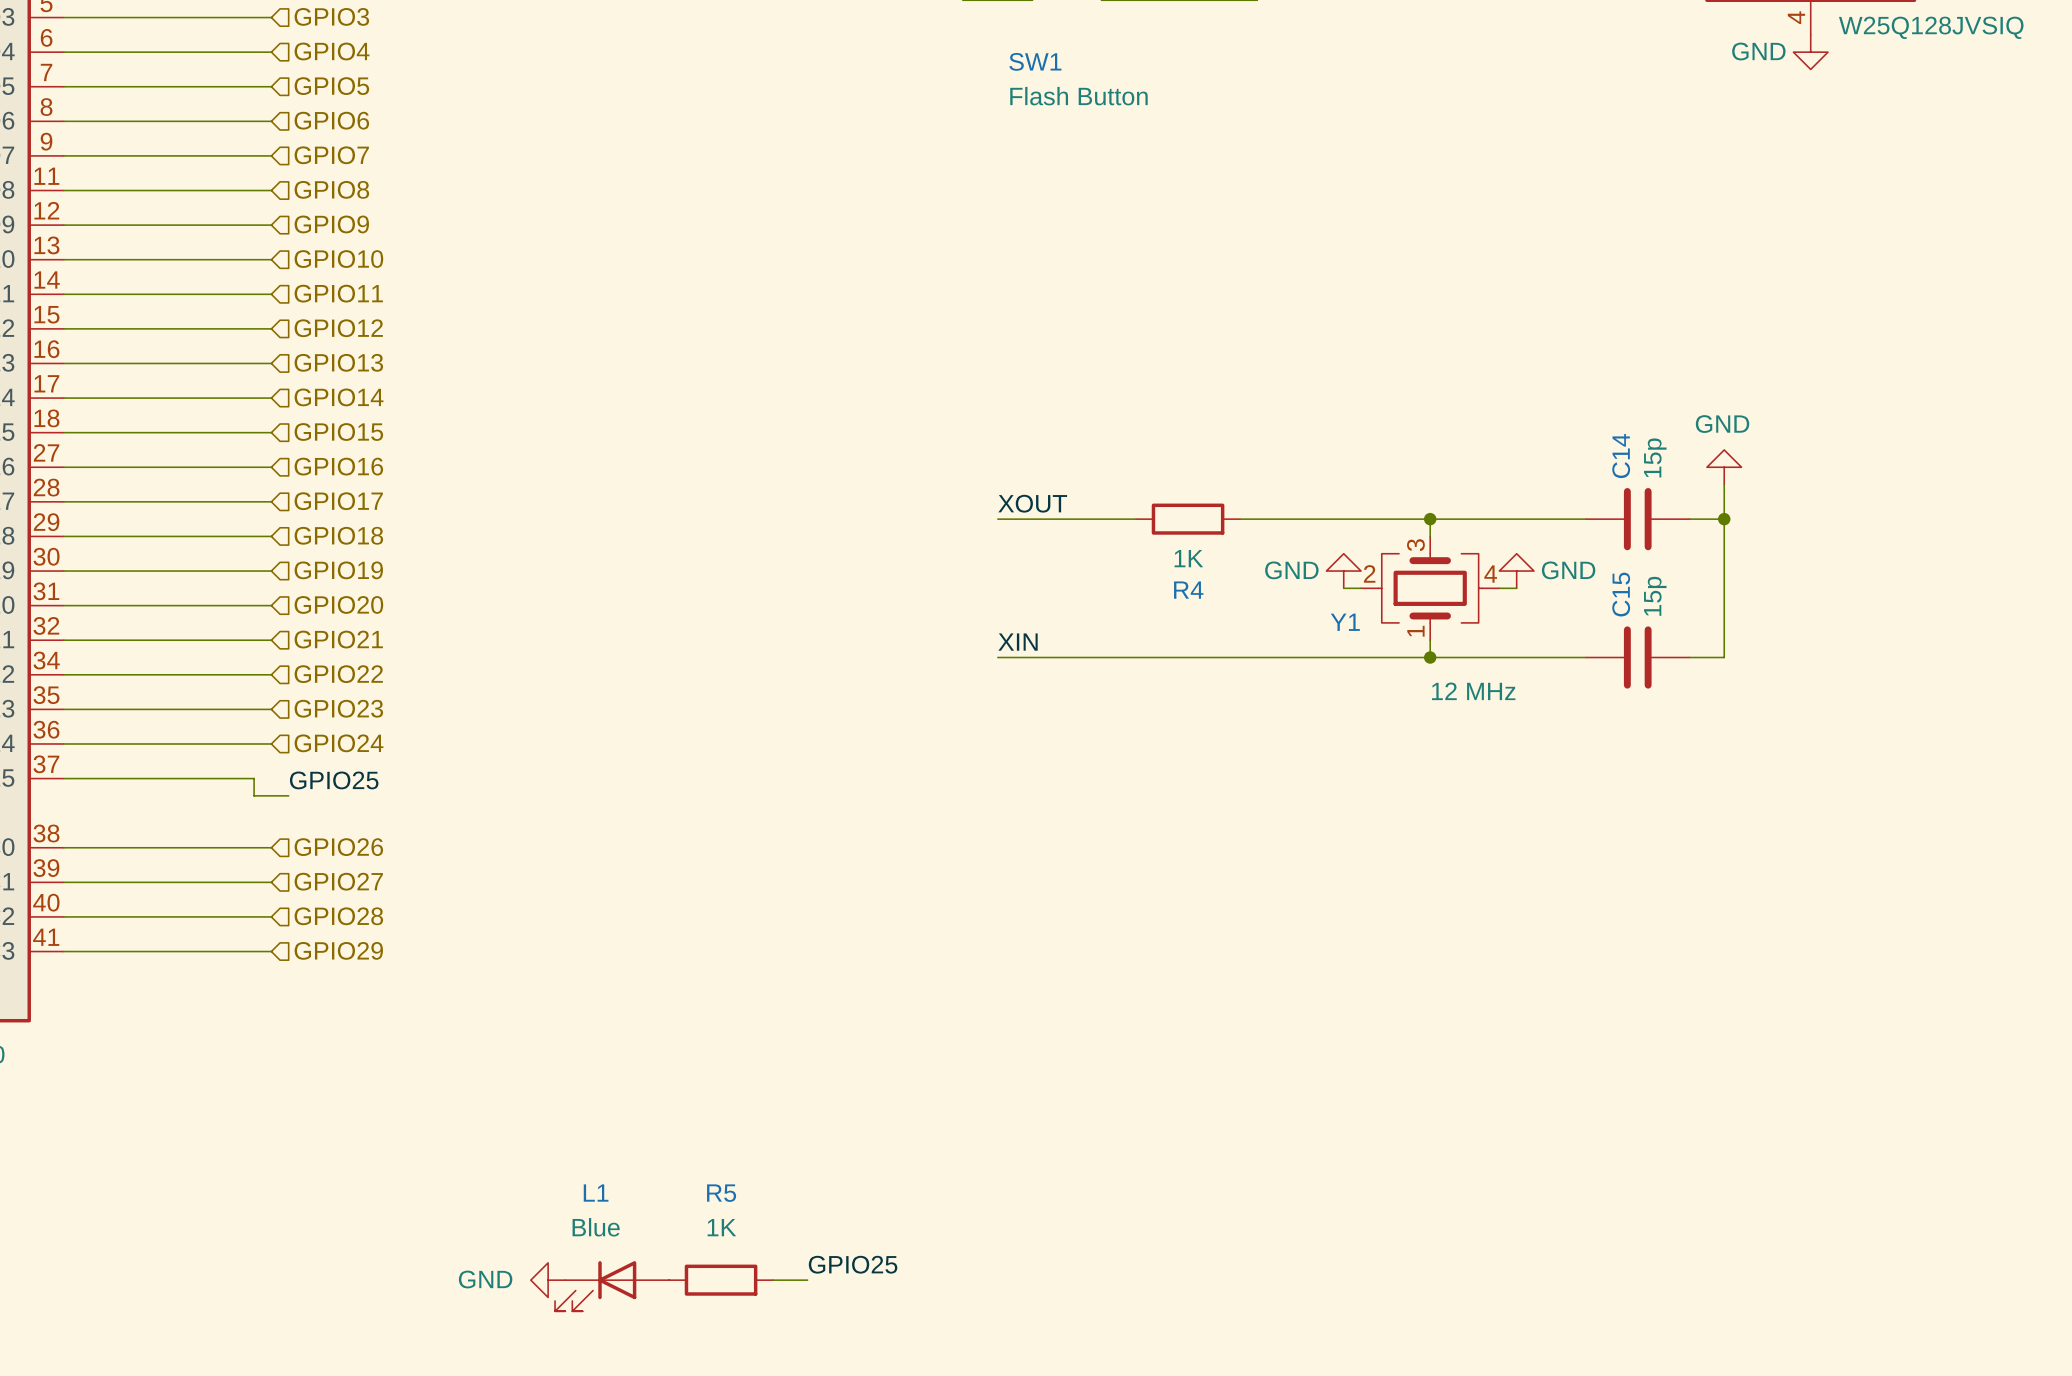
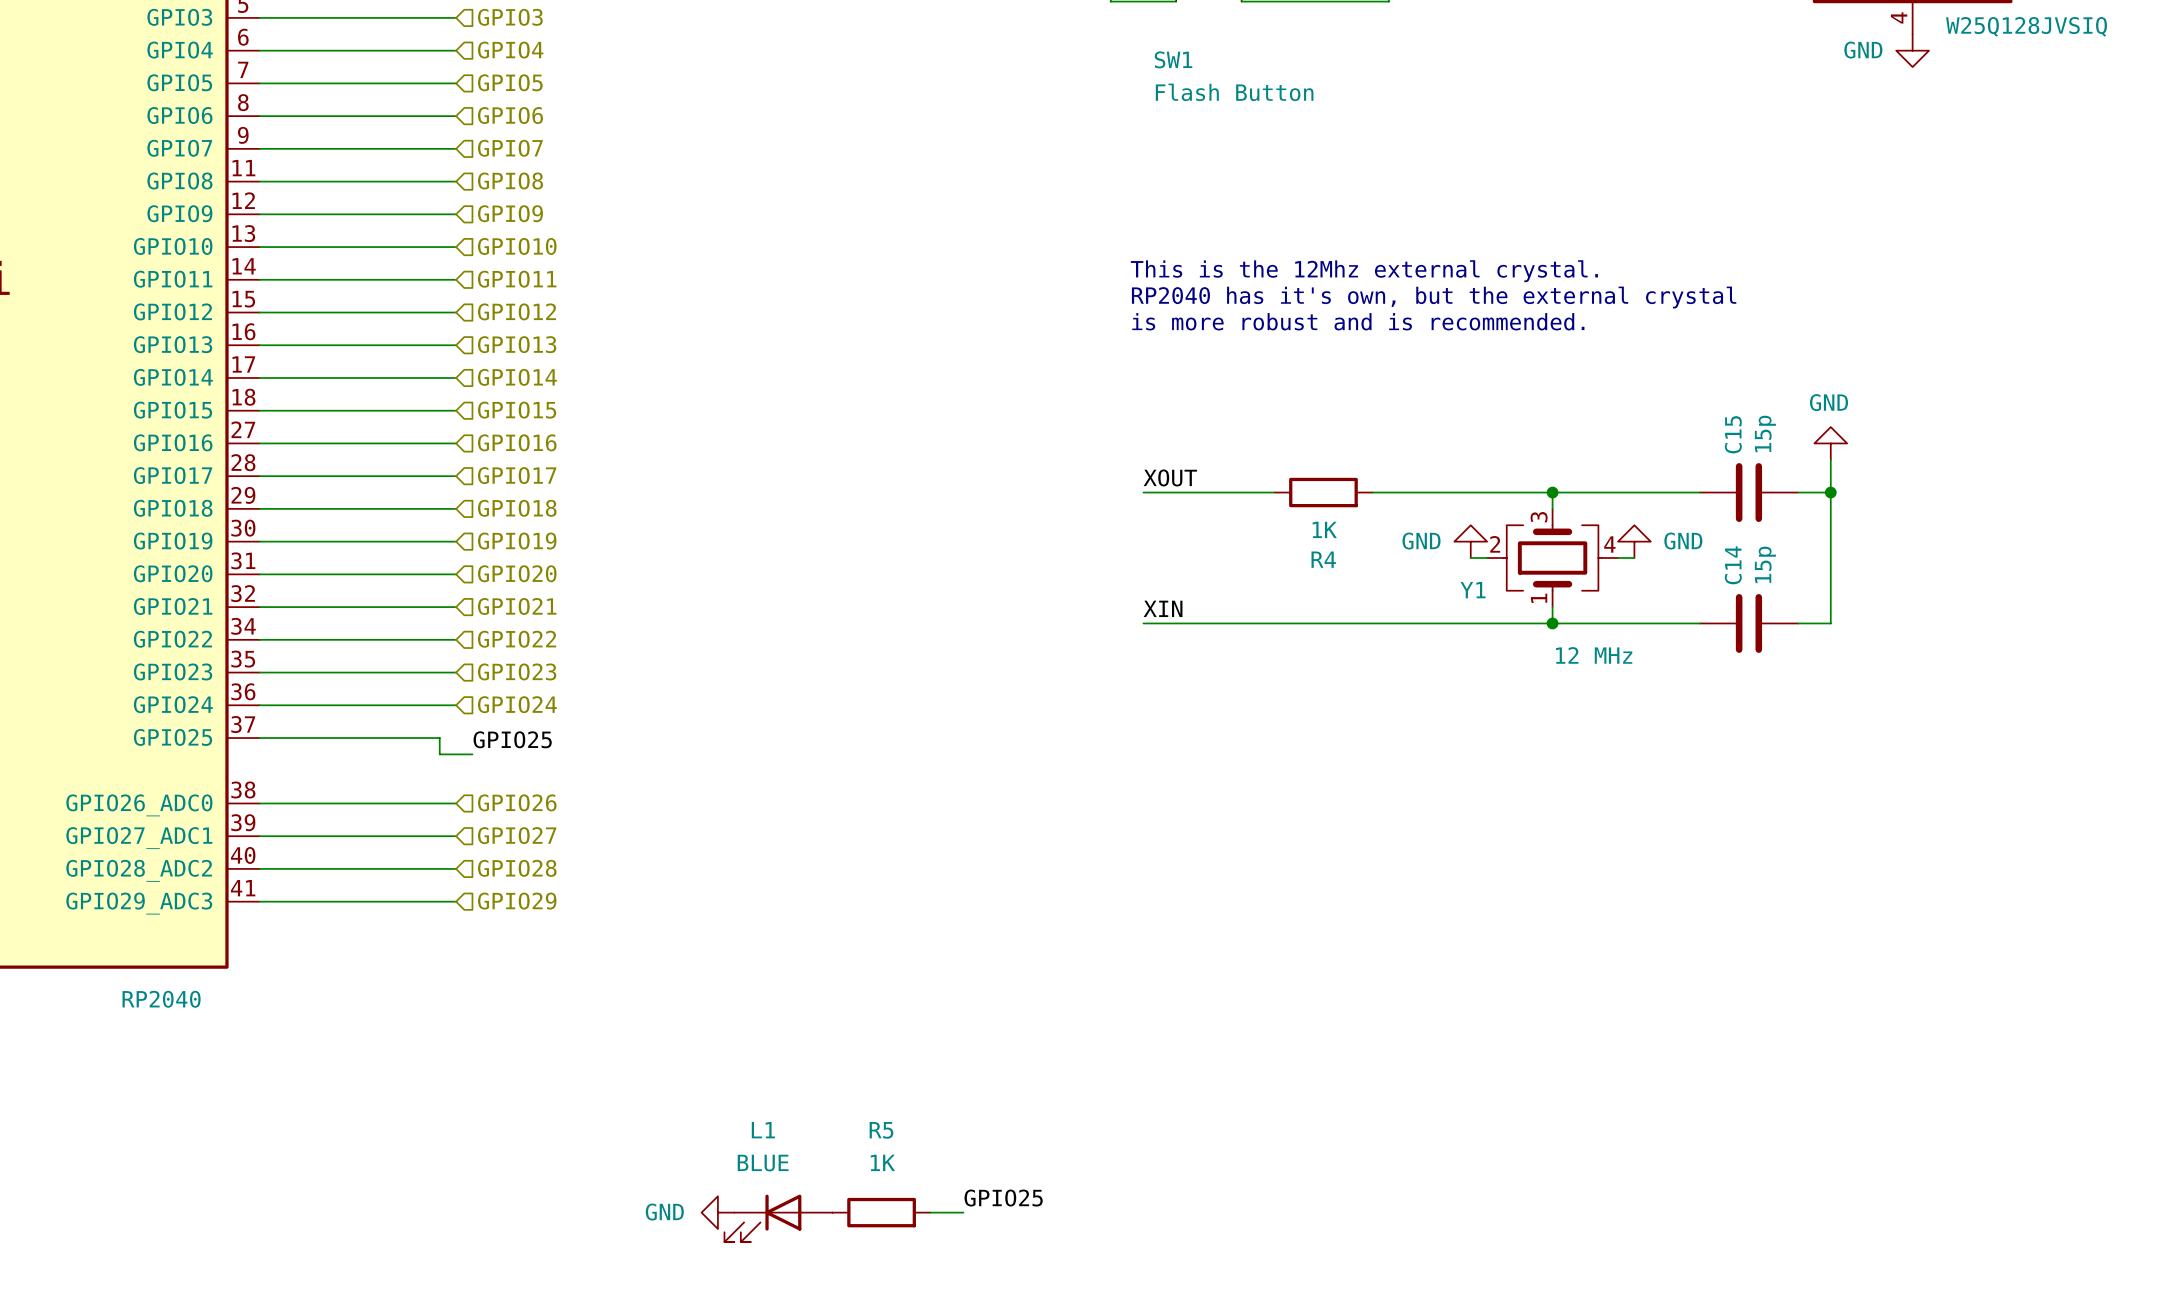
text: none -> This is the 12Mhz external crystal. (1364, 271)
text: none -> RP2040 has it's own, but the external crystal (1434, 297)
text: none -> is more robust and is recommended. (1358, 321)
C14 name: C14 (1621, 456) -> C15 (1733, 434)
C15 name: C15 (1621, 594) -> C14 (1733, 565)
L1 value: Blue (596, 1227) -> BLUE (763, 1163)

